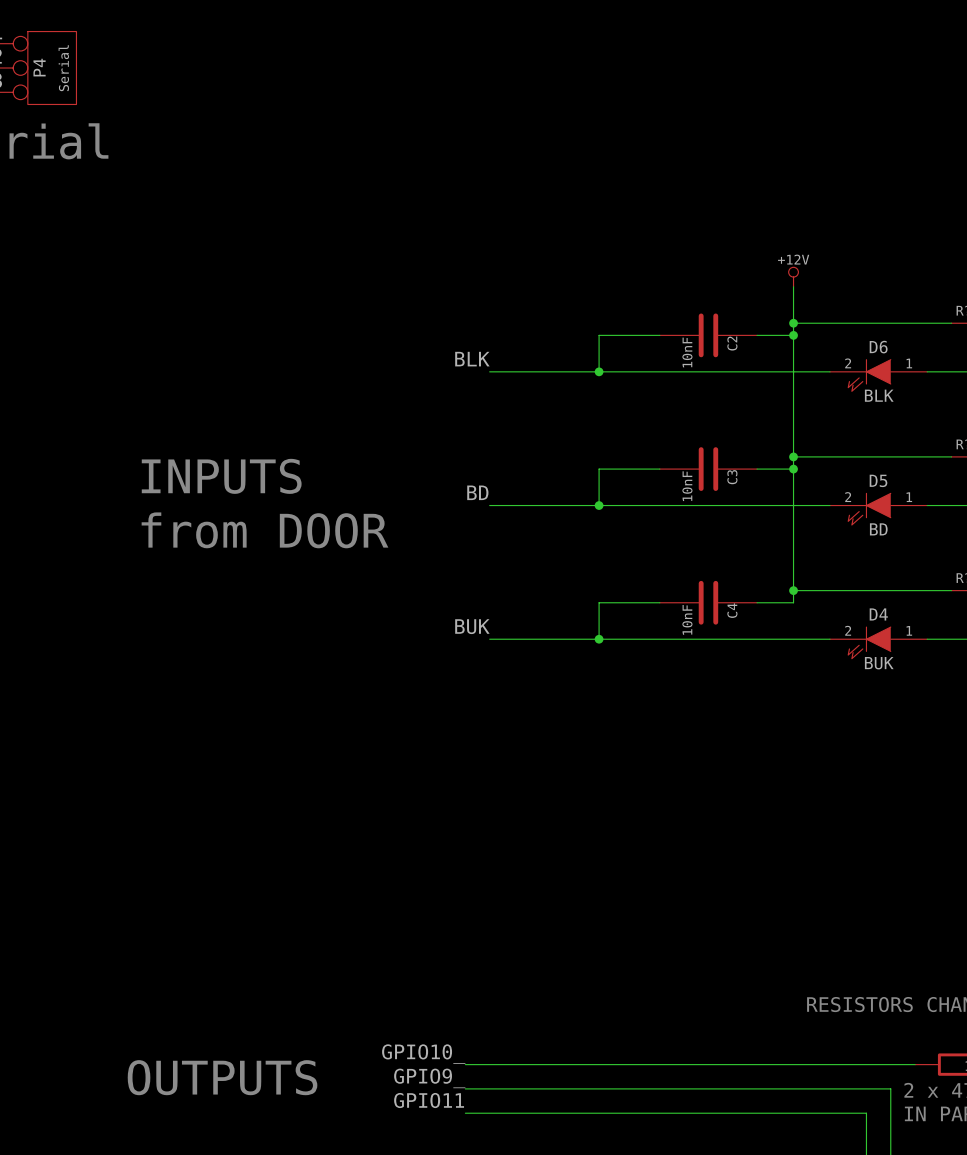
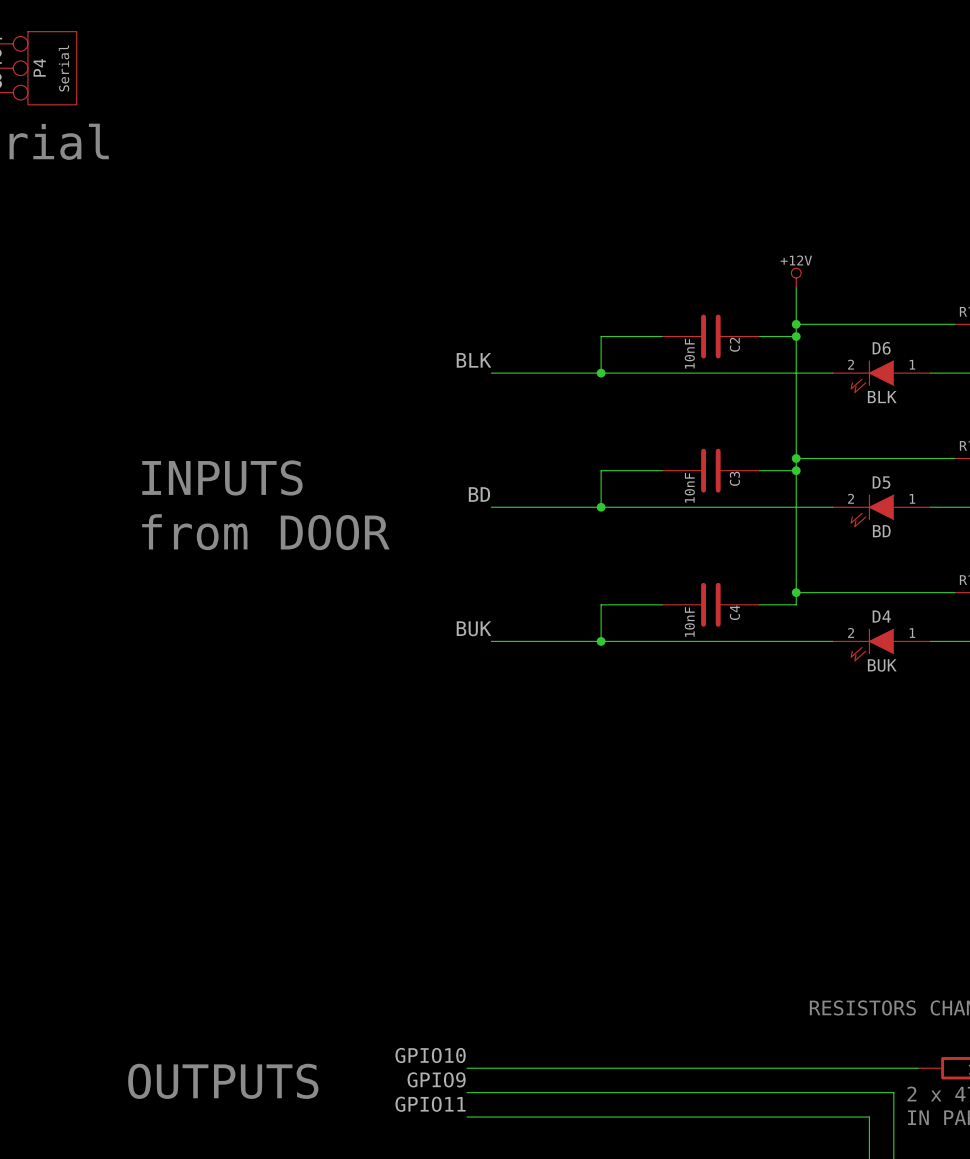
label: GPIO10_ (423, 1054) -> GPIO10 (430, 1055)
label: GPIO9_ (429, 1078) -> GPIO9 (436, 1079)

